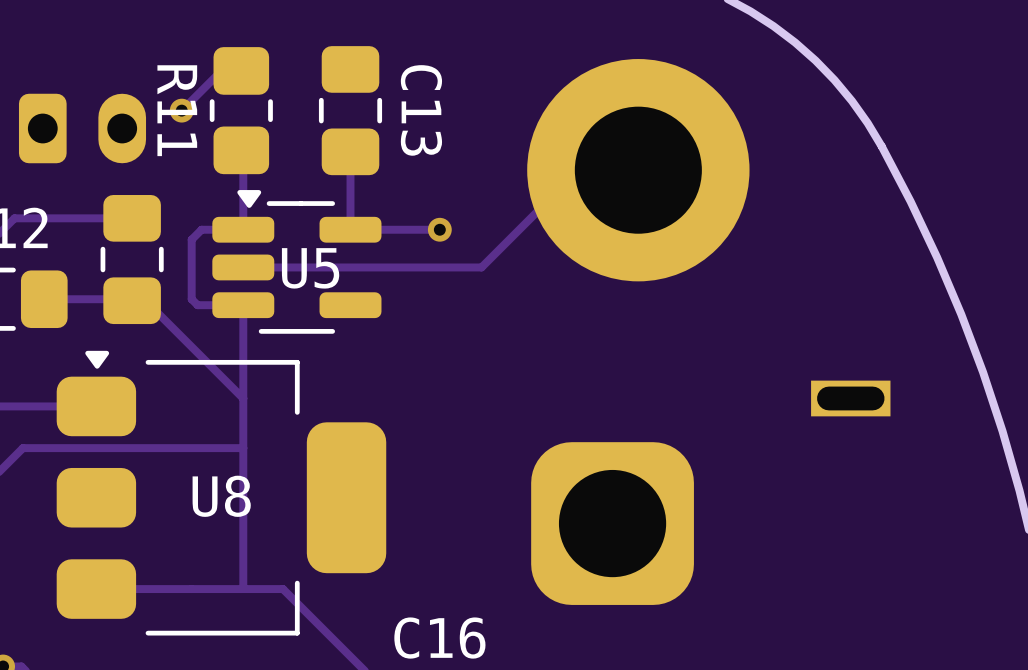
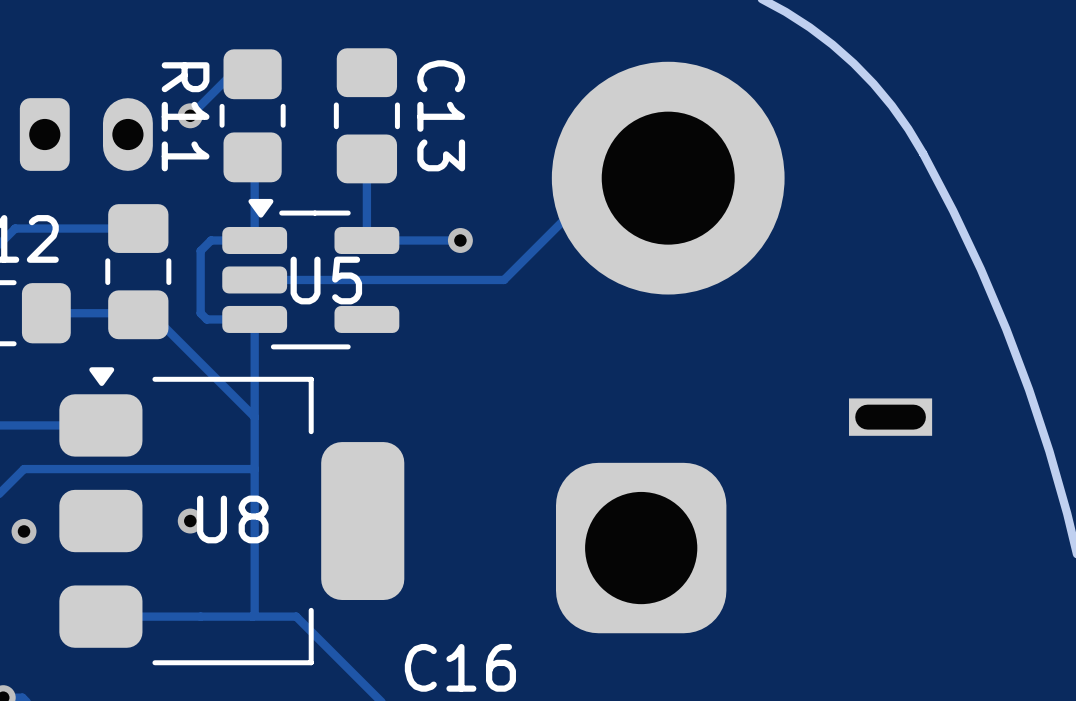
via: none -> (190, 521)
via: none -> (24, 531)

